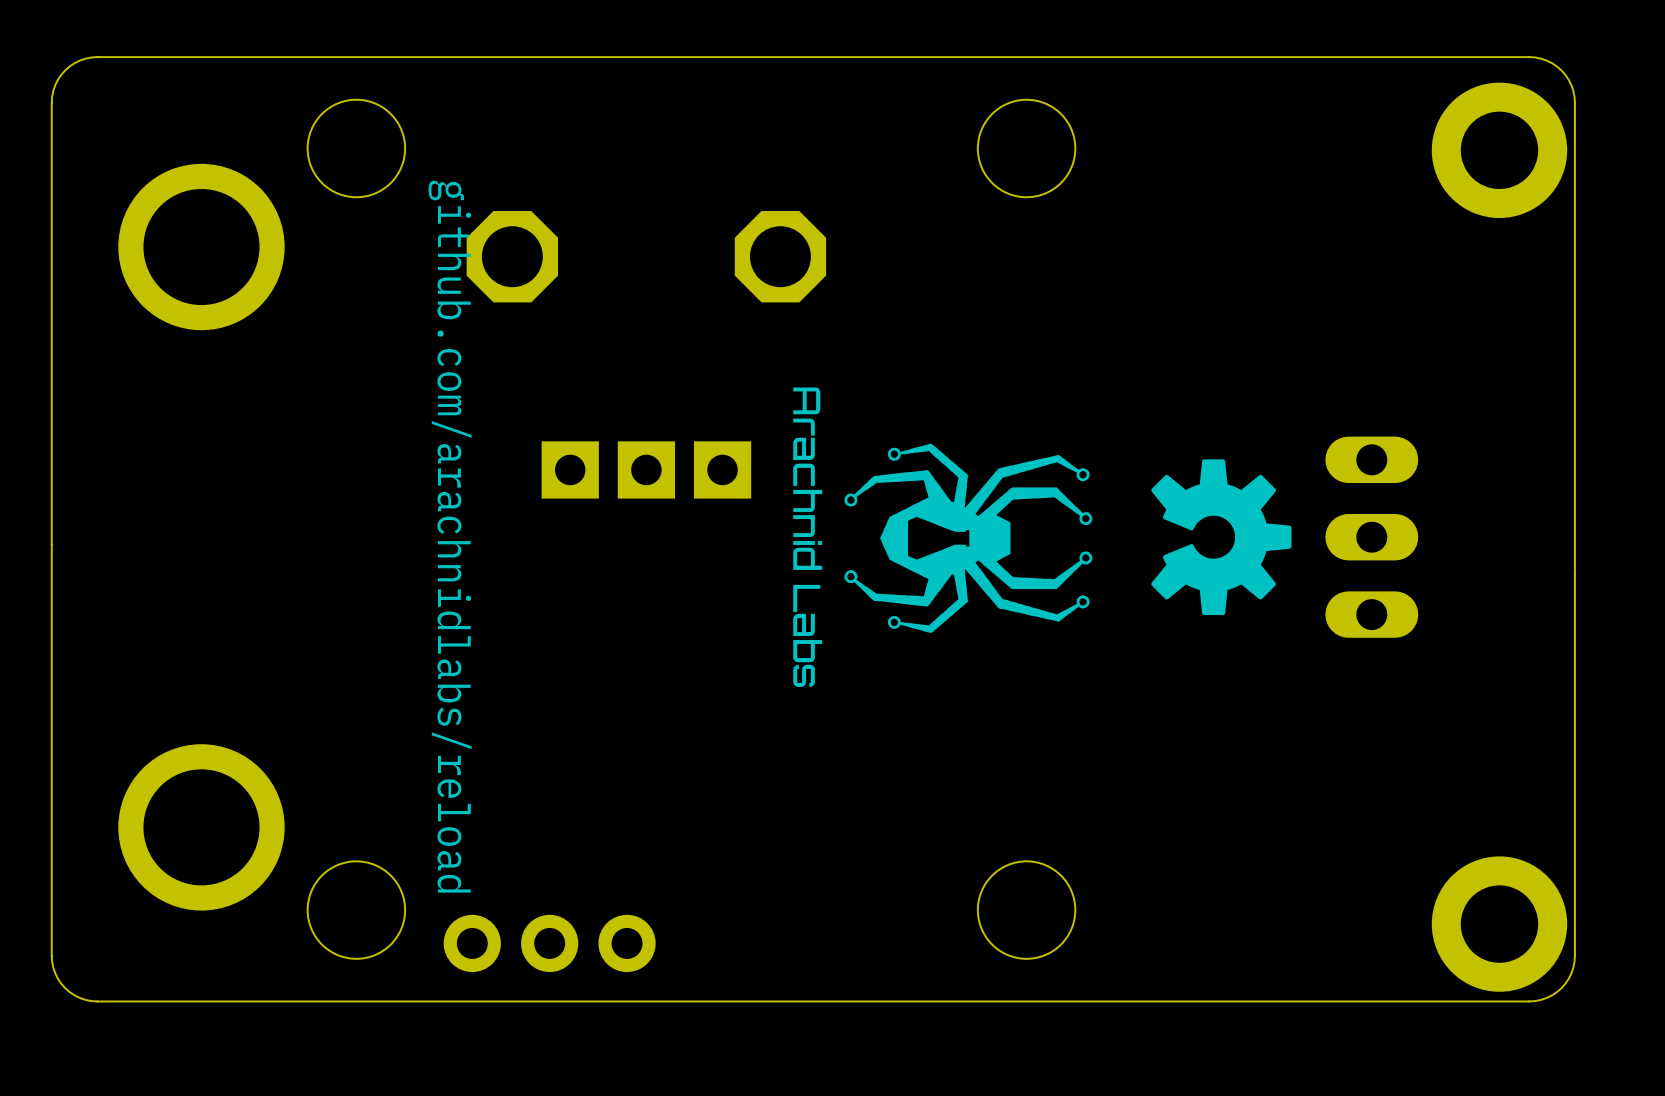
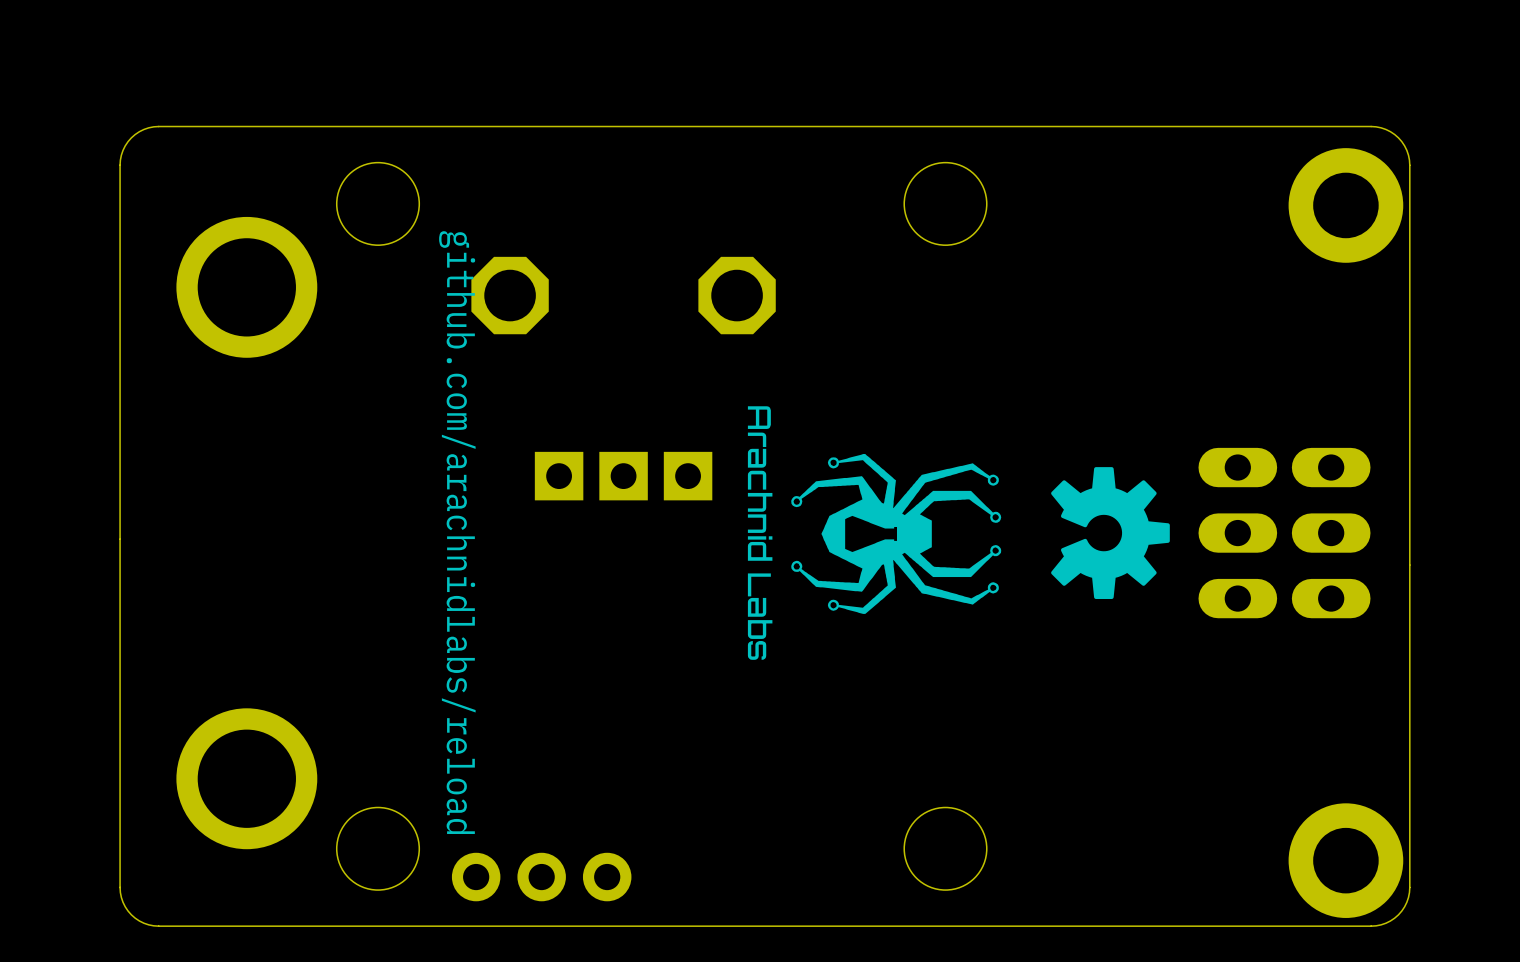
part: none -> (1331, 533)

